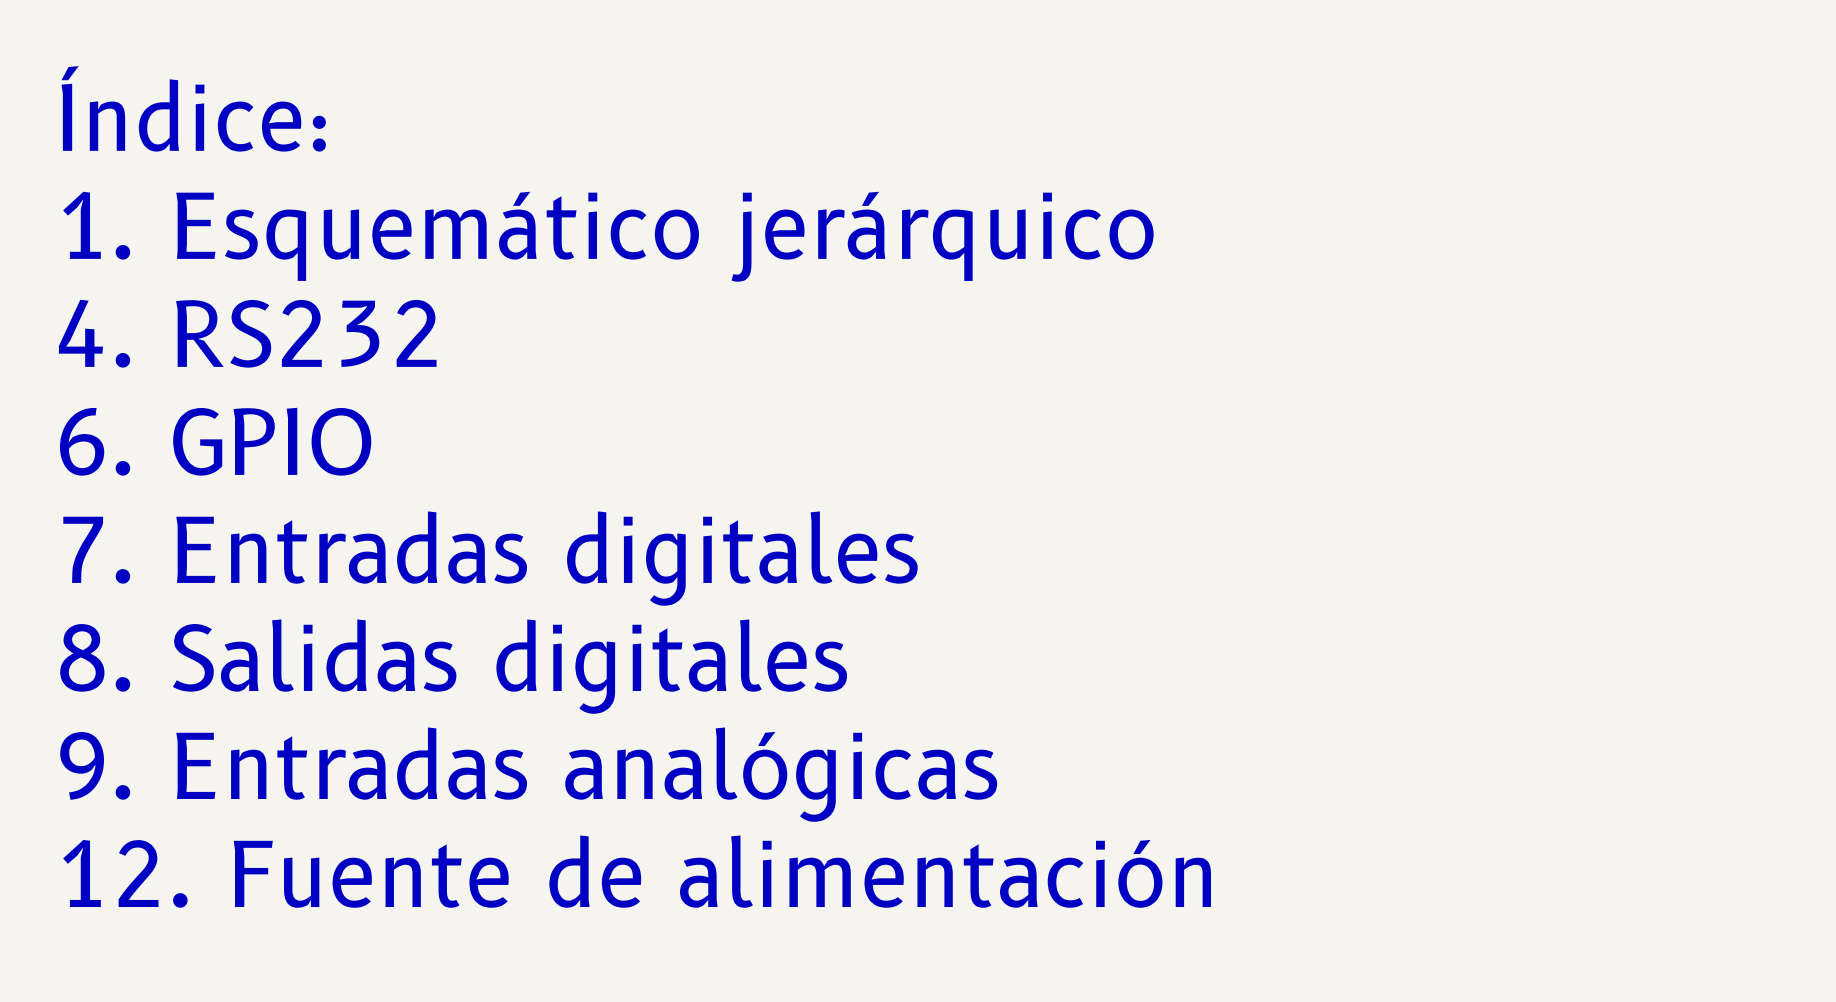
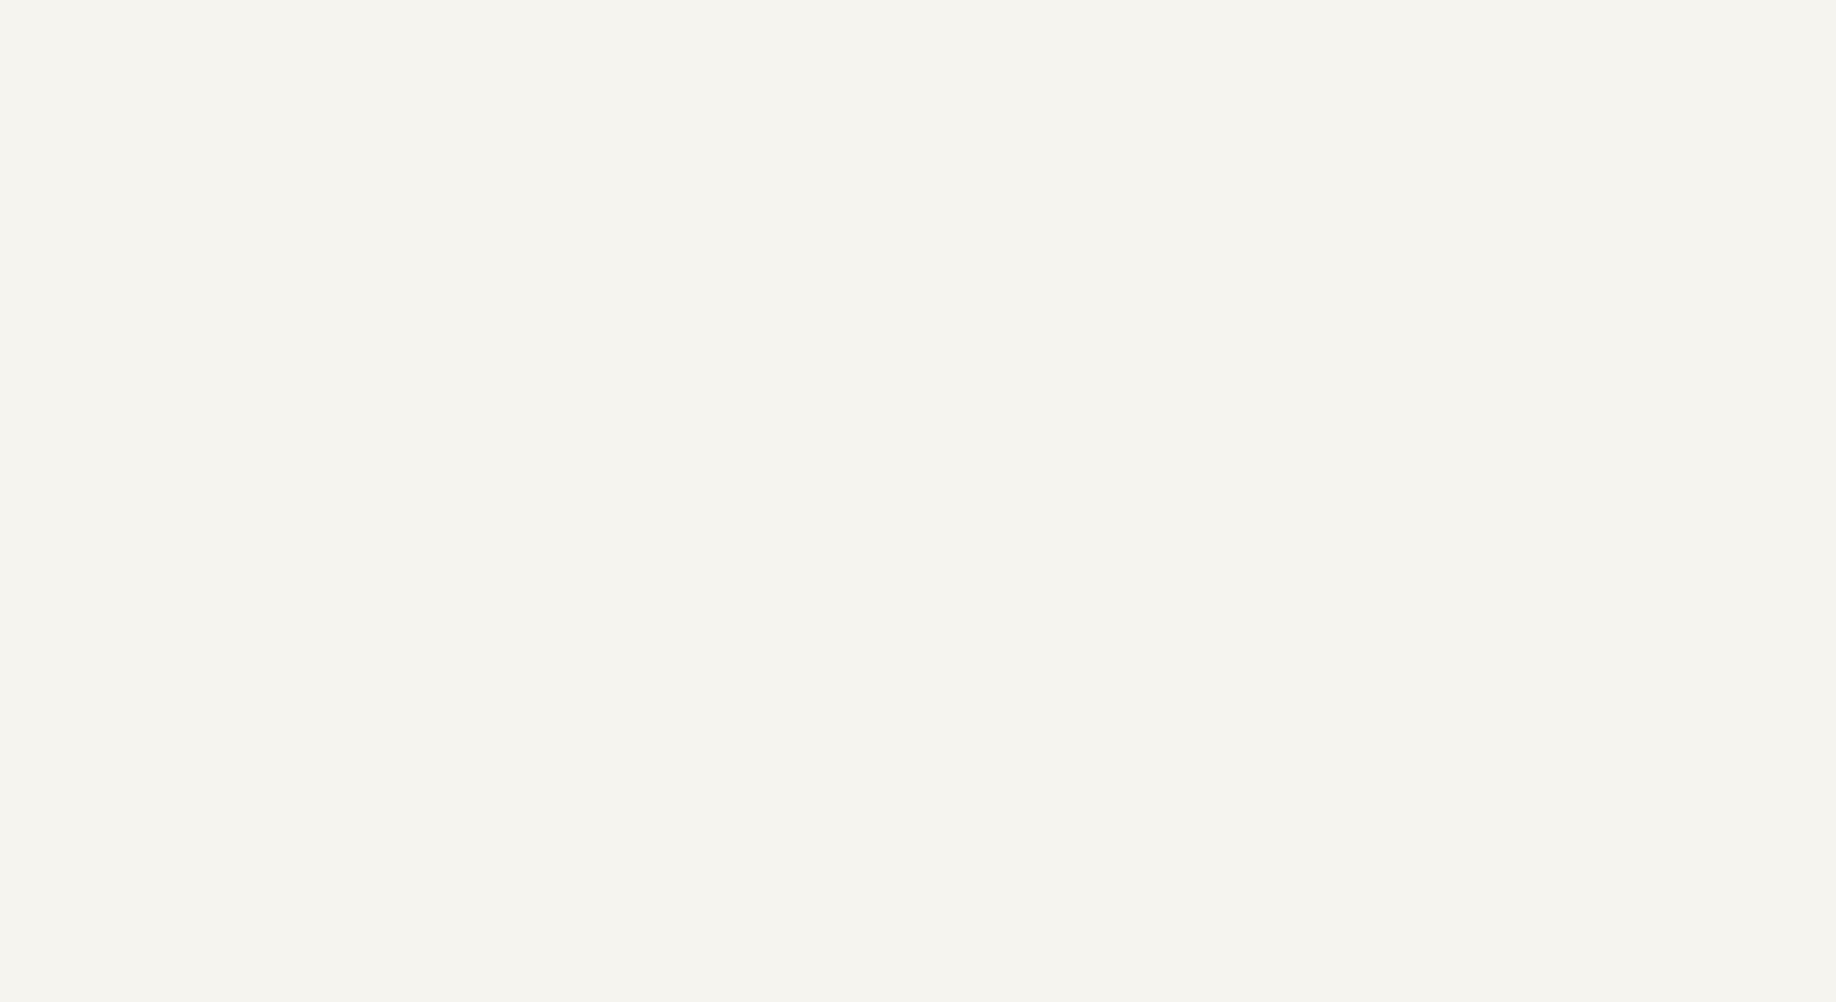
text: Índice: (193, 108) -> none
text: 1. Esquemático jerárquico (608, 236) -> none
text: 4. RS232 (247, 333) -> none
text: 6. GPIO (215, 441) -> none
text: 7. Entradas digitales (490, 558) -> none
text: 8. Salidas digitales (453, 666) -> none
text: 9. Entradas analógicas (528, 774) -> none
text: 12. Fuente de alimentación (637, 871) -> none

